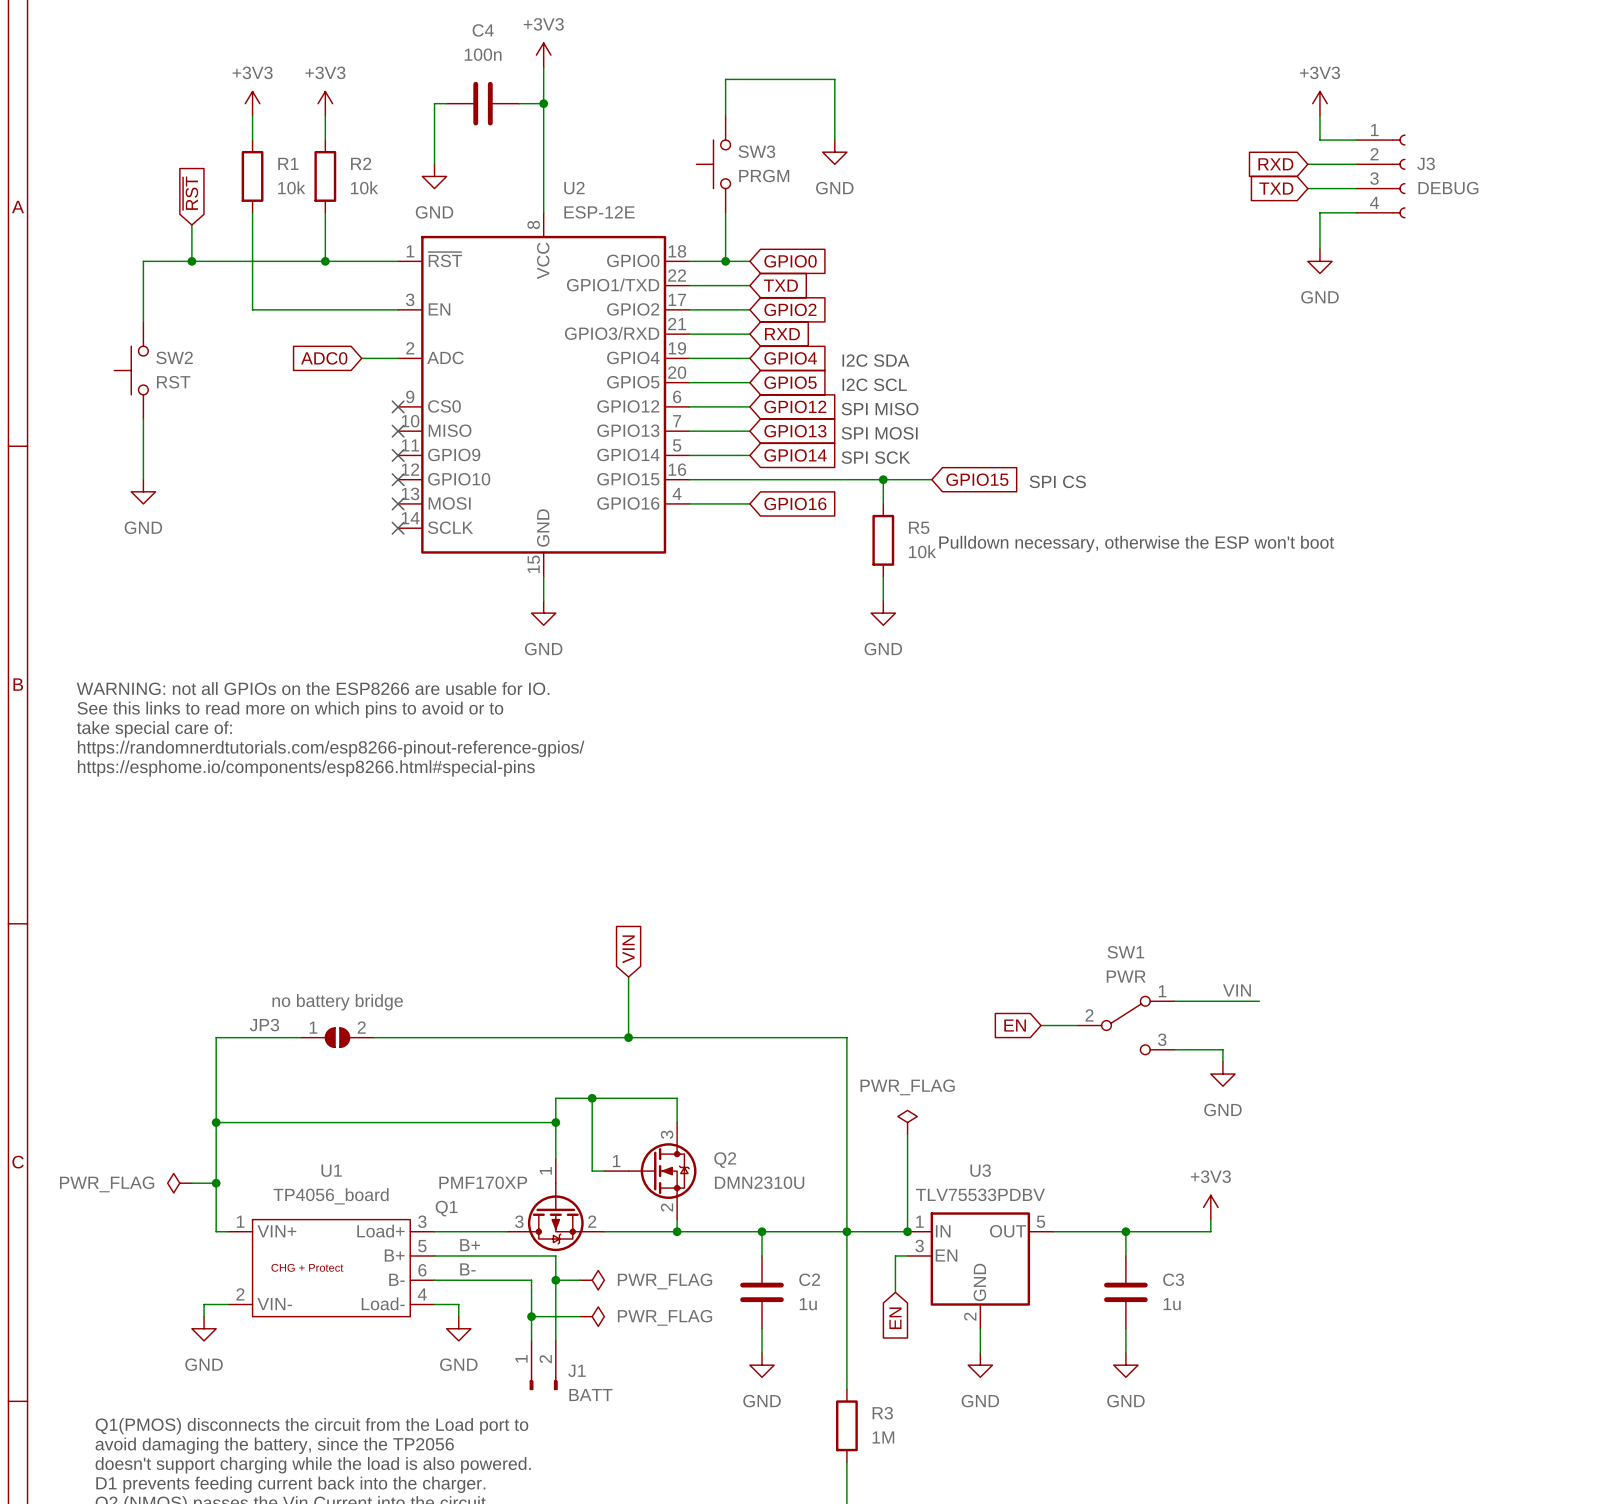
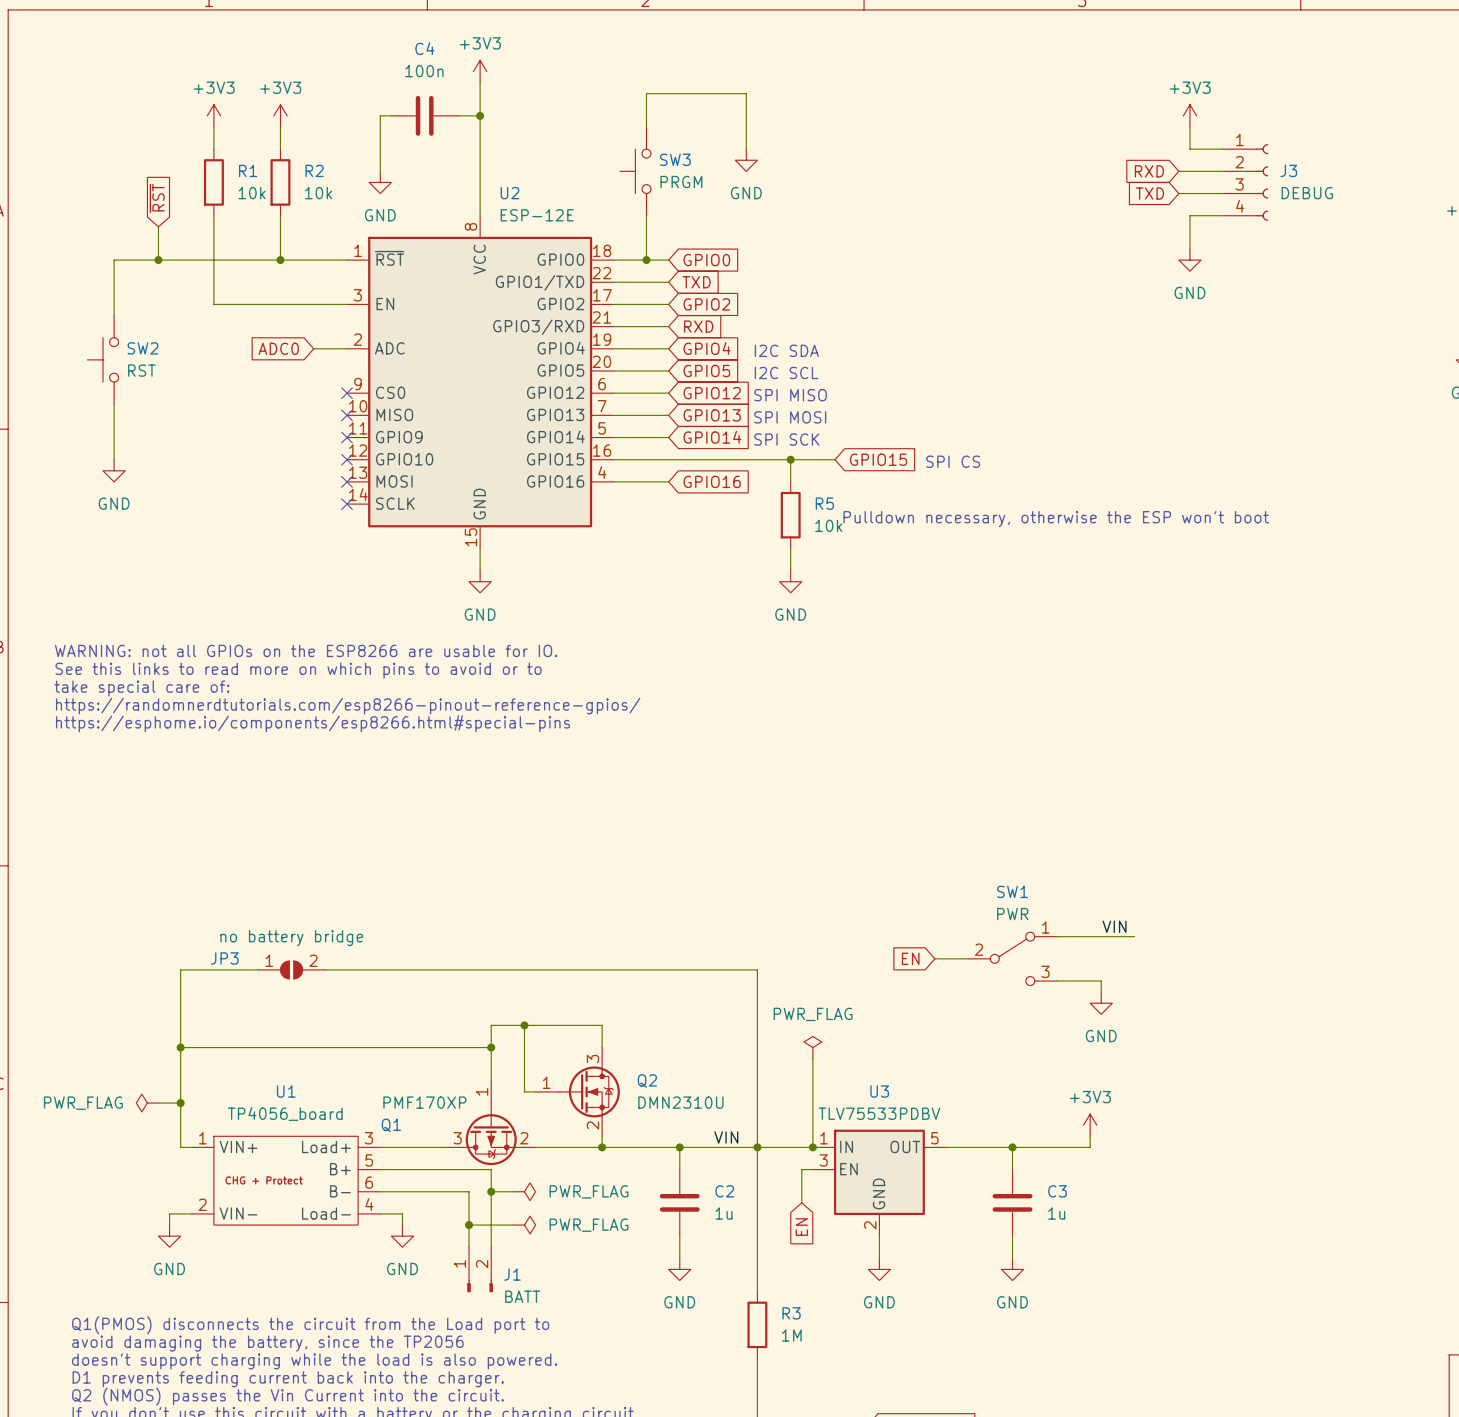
global label: VIN (628, 949) -> none
wire: (628, 977) (628, 1037) -> none
junction: (628, 1037) -> none
label: none -> VIN (726, 1137)
label: B+ (470, 1245) -> none
label: B- (467, 1269) -> none

